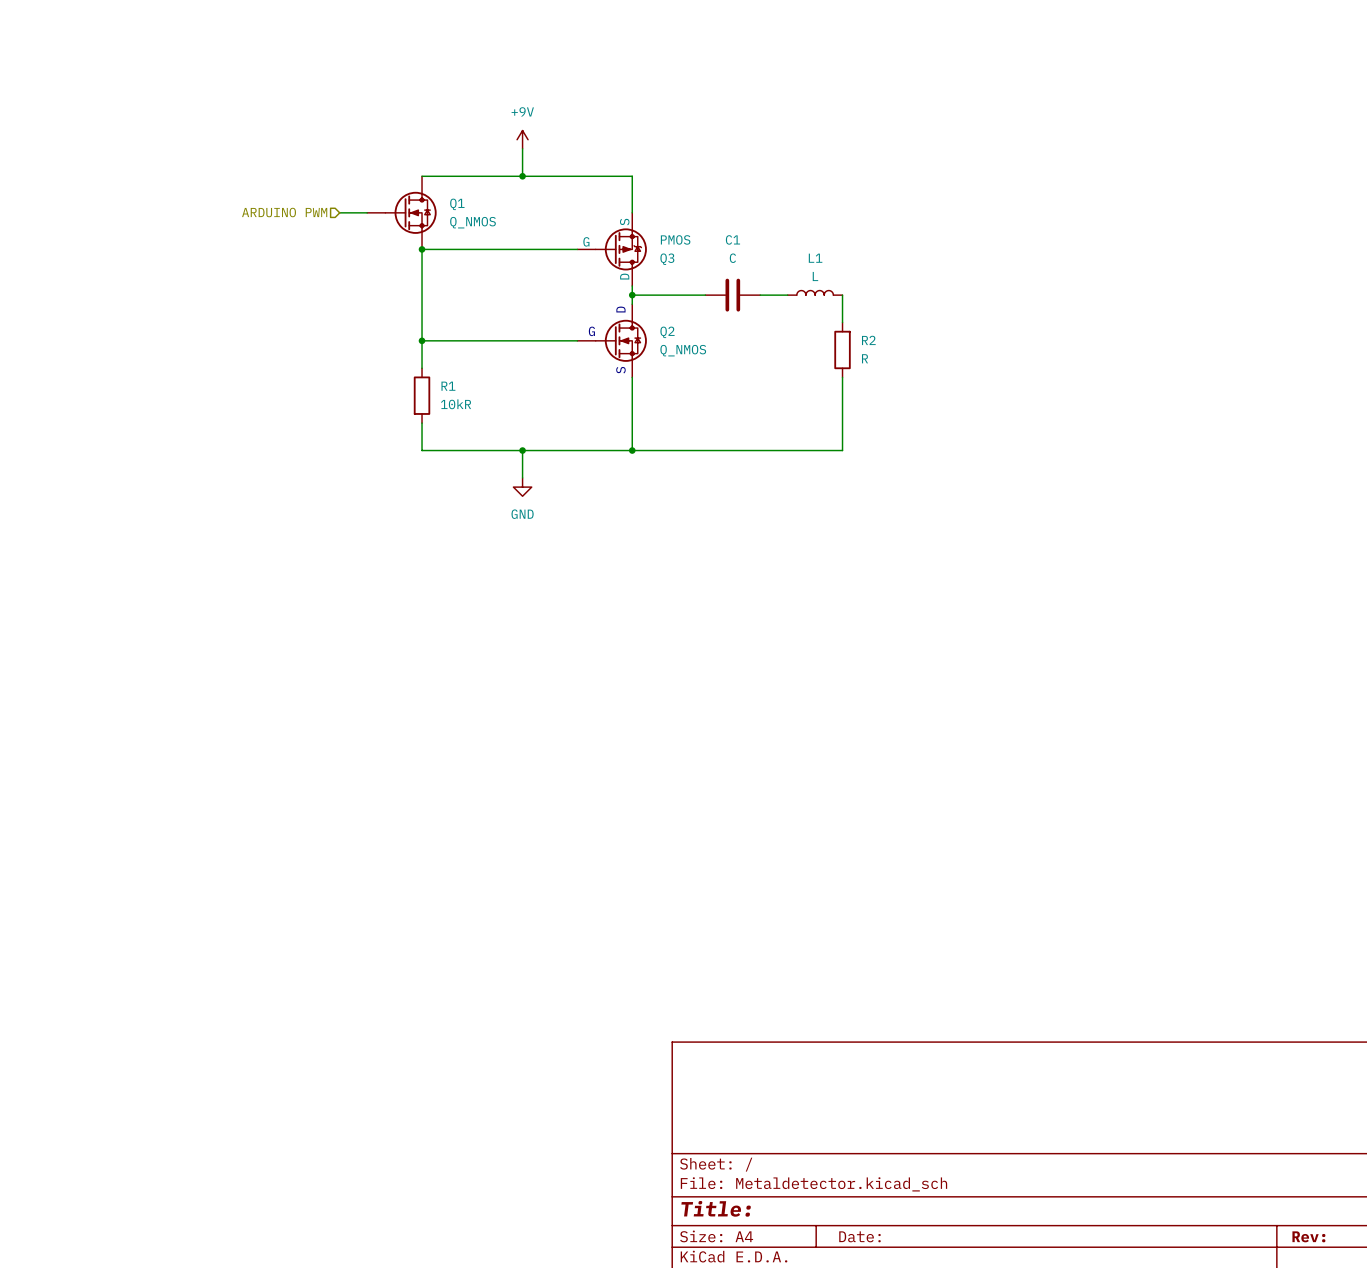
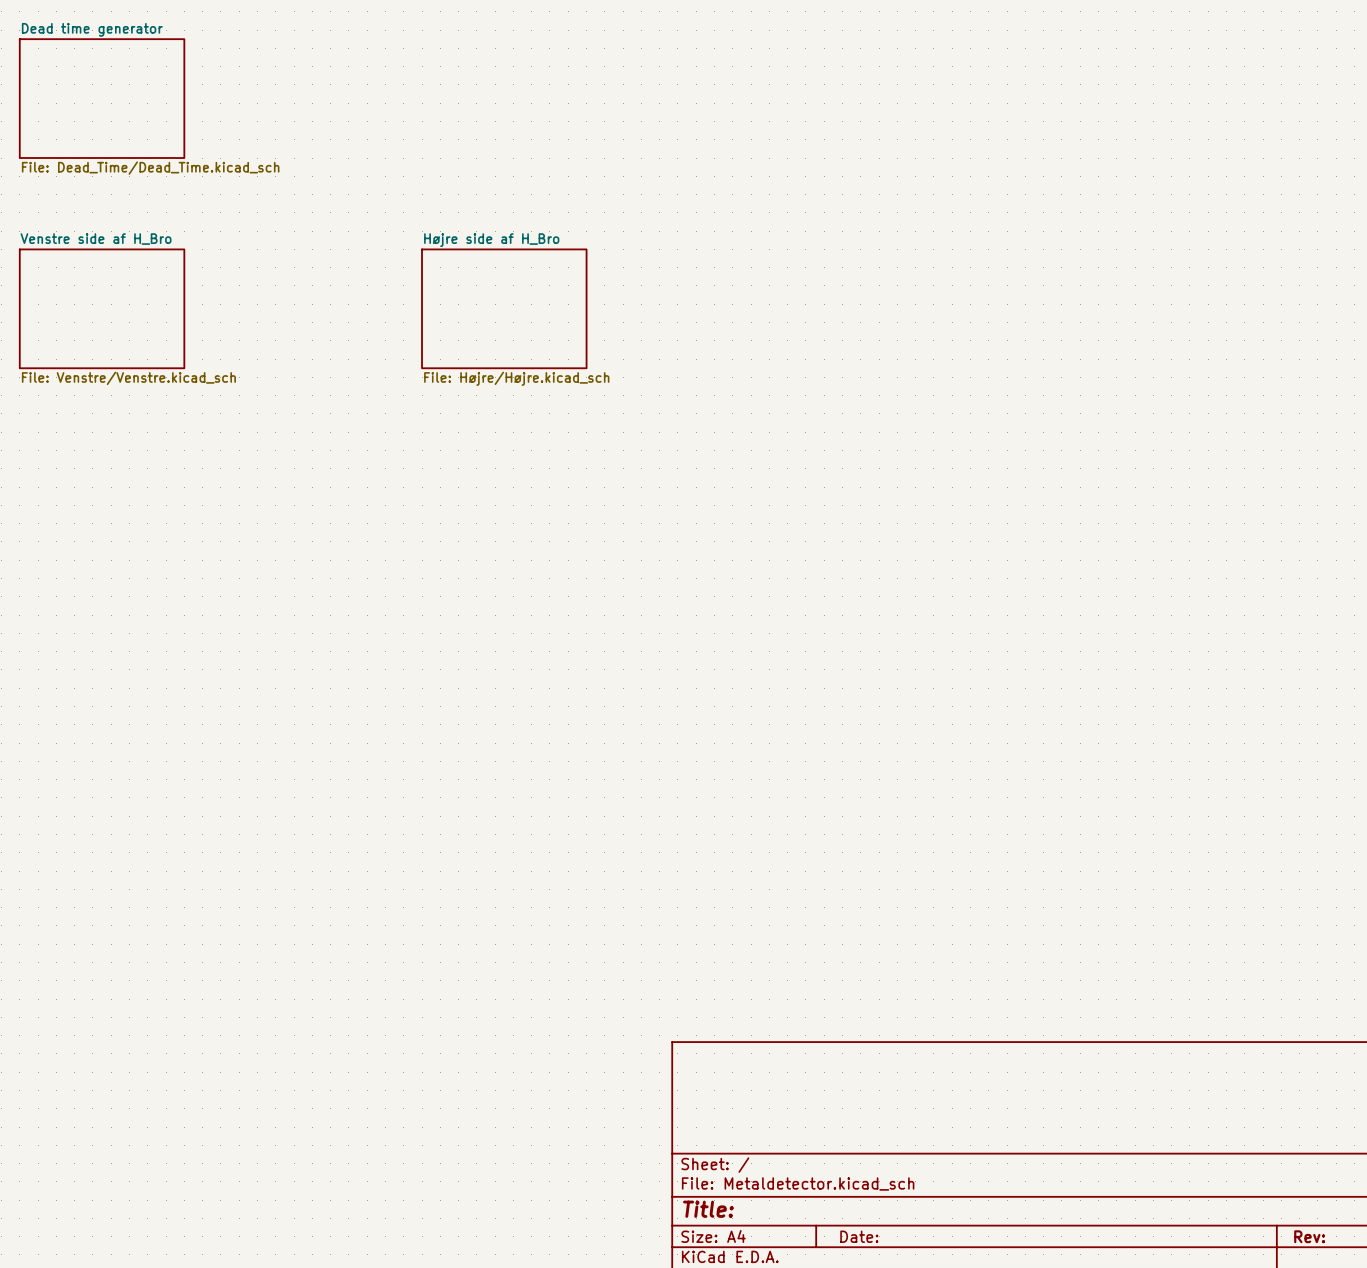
sheet Dead time generator: none -> File: Dead_Time/Dead_Time.kicad_sch (102, 98)
power symbol: +9V (522, 139) -> none
wire: (522, 148) (522, 176) -> none
wire: (422, 176) (632, 176) (632, 212) -> none
junction: (522, 176) -> none
hierarchical label: ARDUINO PWM (284, 212) -> none
wire: (339, 212) (367, 212) -> none
Q1: Q_NMOS (401, 212) -> none
junction: (422, 249) -> none
Q3: PMOS (612, 249) -> none
wire: (632, 285) (632, 304) -> none
L1: L (815, 292) -> none
wire: (632, 295) (705, 295) -> none
junction: (632, 295) -> none
C1: C (732, 295) -> none
wire: (760, 295) (787, 295) -> none
wire: (842, 295) (842, 322) -> none
sheet Venstre side af H_Bro: none -> File: Venstre/Venstre.kicad_sch (102, 308)
sheet Højre side af H_Bro: none -> File: Højre/Højre.kicad_sch (504, 308)
text: D (620, 309) -> none
text: G (591, 331) -> none
wire: (422, 340) (577, 340) -> none
junction: (422, 340) -> none
Q2: Q_NMOS (612, 340) -> none
R2: R (842, 349) -> none
text: S (620, 370) -> none
wire: (632, 377) (632, 450) -> none
wire: (842, 377) (842, 450) (422, 450) (422, 423) -> none
R1: 10kR (422, 395) -> none
wire: (522, 450) (522, 477) -> none
junction: (522, 450) -> none
junction: (632, 450) -> none
power symbol: GND (522, 487) -> none

